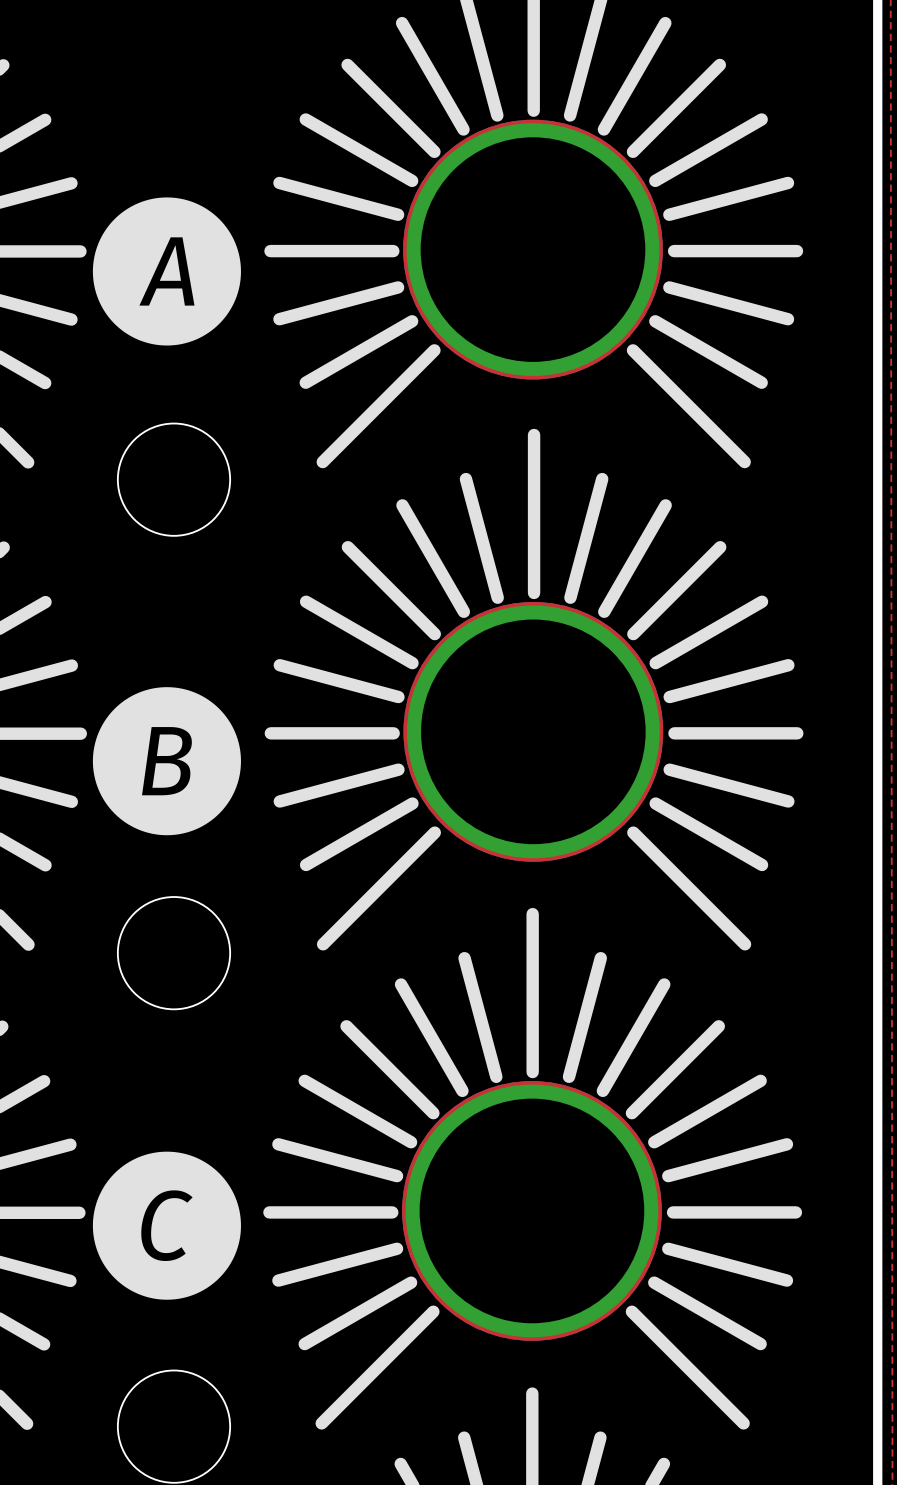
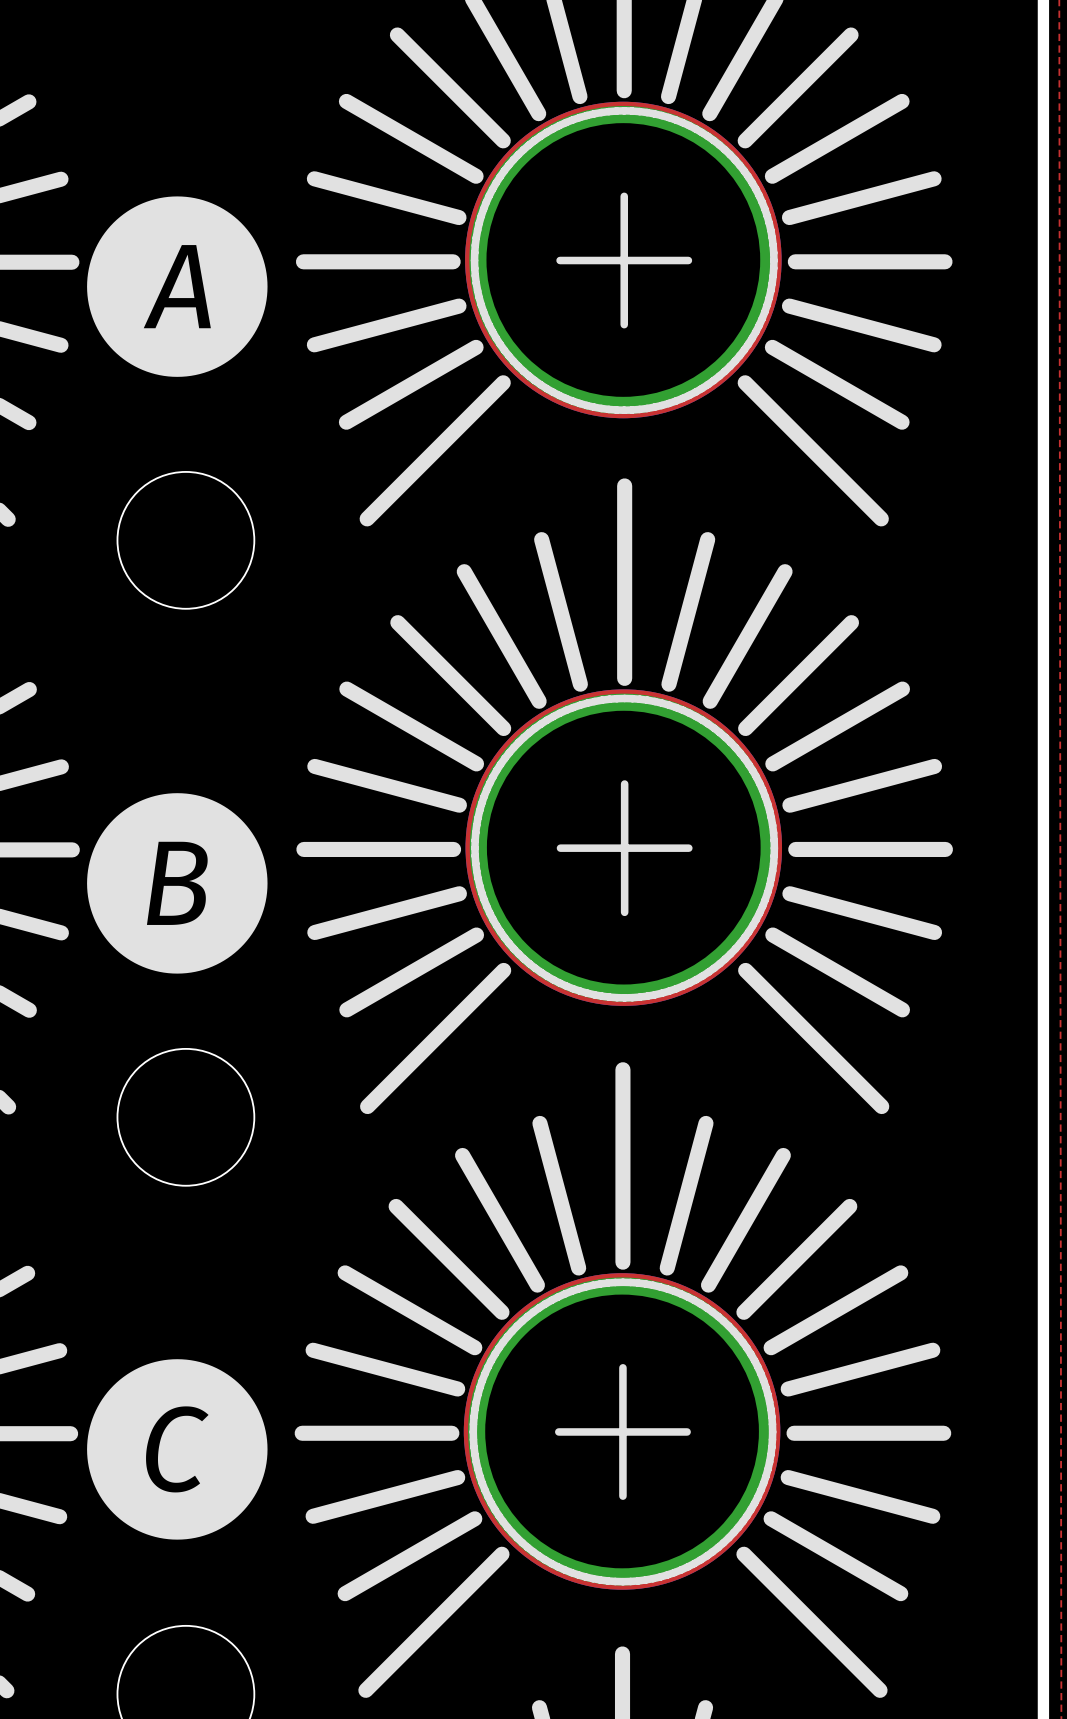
line: none -> (616, 111) (647, 112) (675, 119) (701, 132) (724, 149) (744, 170) (759, 195) (769, 223) (773, 252) (772, 283) (764, 311) (752, 338) (735, 361) (713, 380) (689, 395) (661, 405) (631, 410) (601, 408) (572, 401) (546, 388) (523, 371) (504, 350) (489, 325) (479, 297) (474, 268) (476, 237) (483, 209) (496, 182) (513, 159) (534, 140) (559, 125) (586, 115) (616, 111)
line: none -> (624, 196) (624, 324)
line: none -> (560, 260) (688, 260)
line: none -> (616, 698) (647, 700) (676, 707) (702, 720) (725, 737) (744, 758) (759, 783) (769, 810) (774, 840) (772, 870) (765, 899) (752, 925) (735, 948) (714, 968) (689, 983) (662, 993) (632, 997) (601, 996) (573, 988) (547, 976) (524, 958) (504, 937) (489, 913) (479, 885) (475, 855) (476, 825) (484, 796) (496, 770) (513, 747) (535, 728) (559, 713) (587, 703) (616, 698)
line: none -> (624, 784) (624, 912)
line: none -> (560, 848) (688, 848)
line: none -> (615, 1282) (585, 1286) (558, 1297) (533, 1312) (512, 1331) (494, 1354) (482, 1380) (474, 1409) (473, 1439) (477, 1469) (488, 1496) (503, 1521) (522, 1542) (545, 1560) (571, 1572) (600, 1579) (630, 1581) (660, 1576) (687, 1566) (712, 1551) (733, 1532) (750, 1509) (763, 1483) (770, 1454) (772, 1424) (767, 1394) (757, 1367) (742, 1342) (723, 1321) (700, 1303) (674, 1291) (645, 1284) (615, 1282)
line: none -> (622, 1367) (622, 1496)
line: none -> (558, 1431) (687, 1431)

